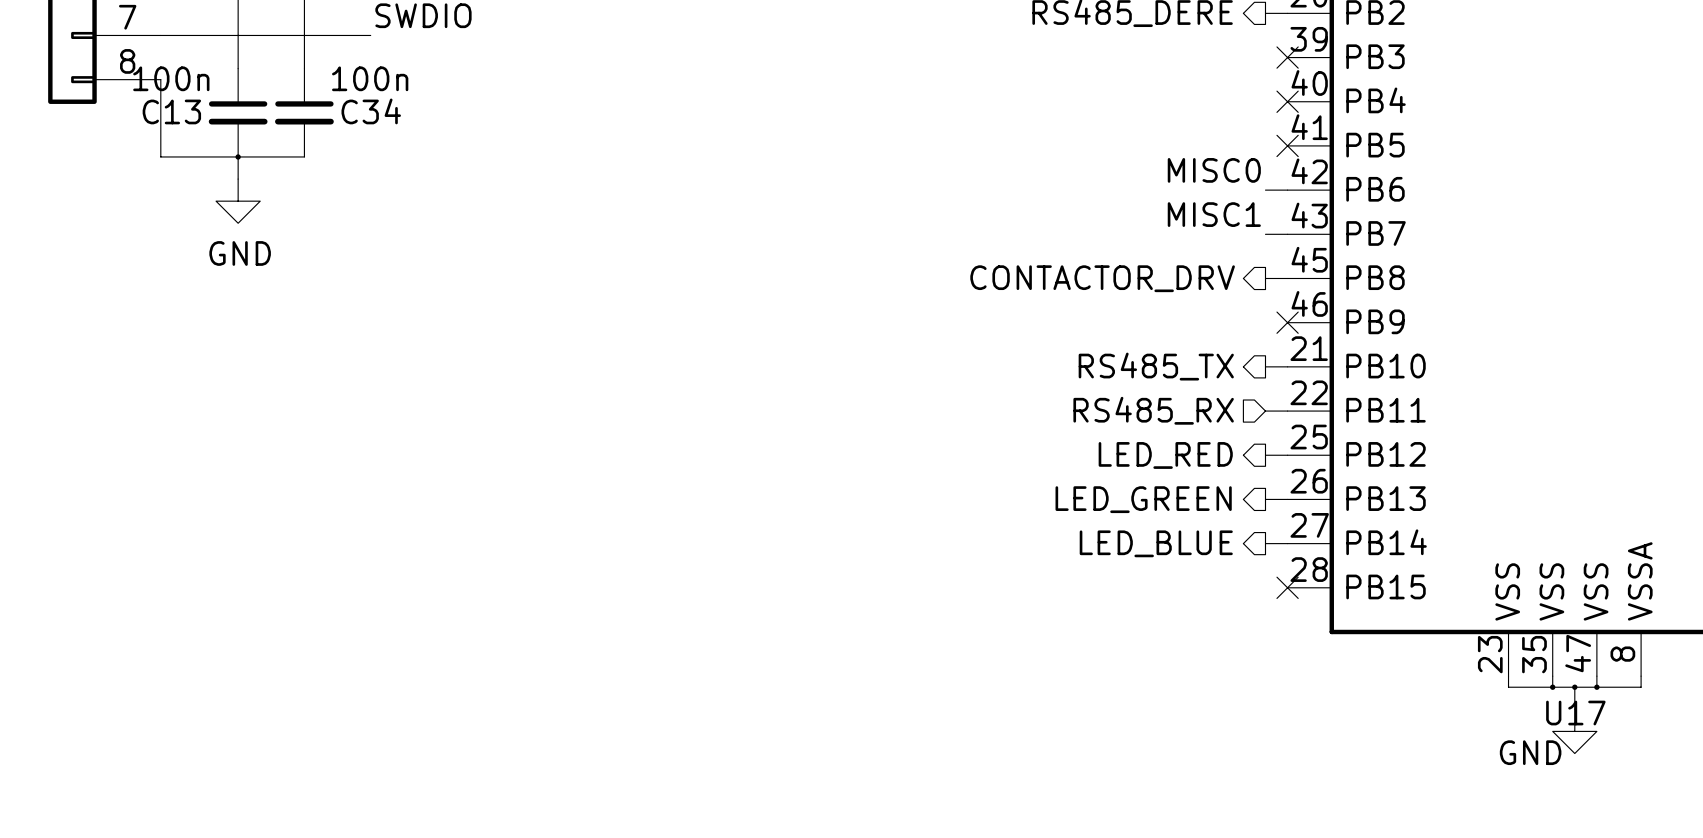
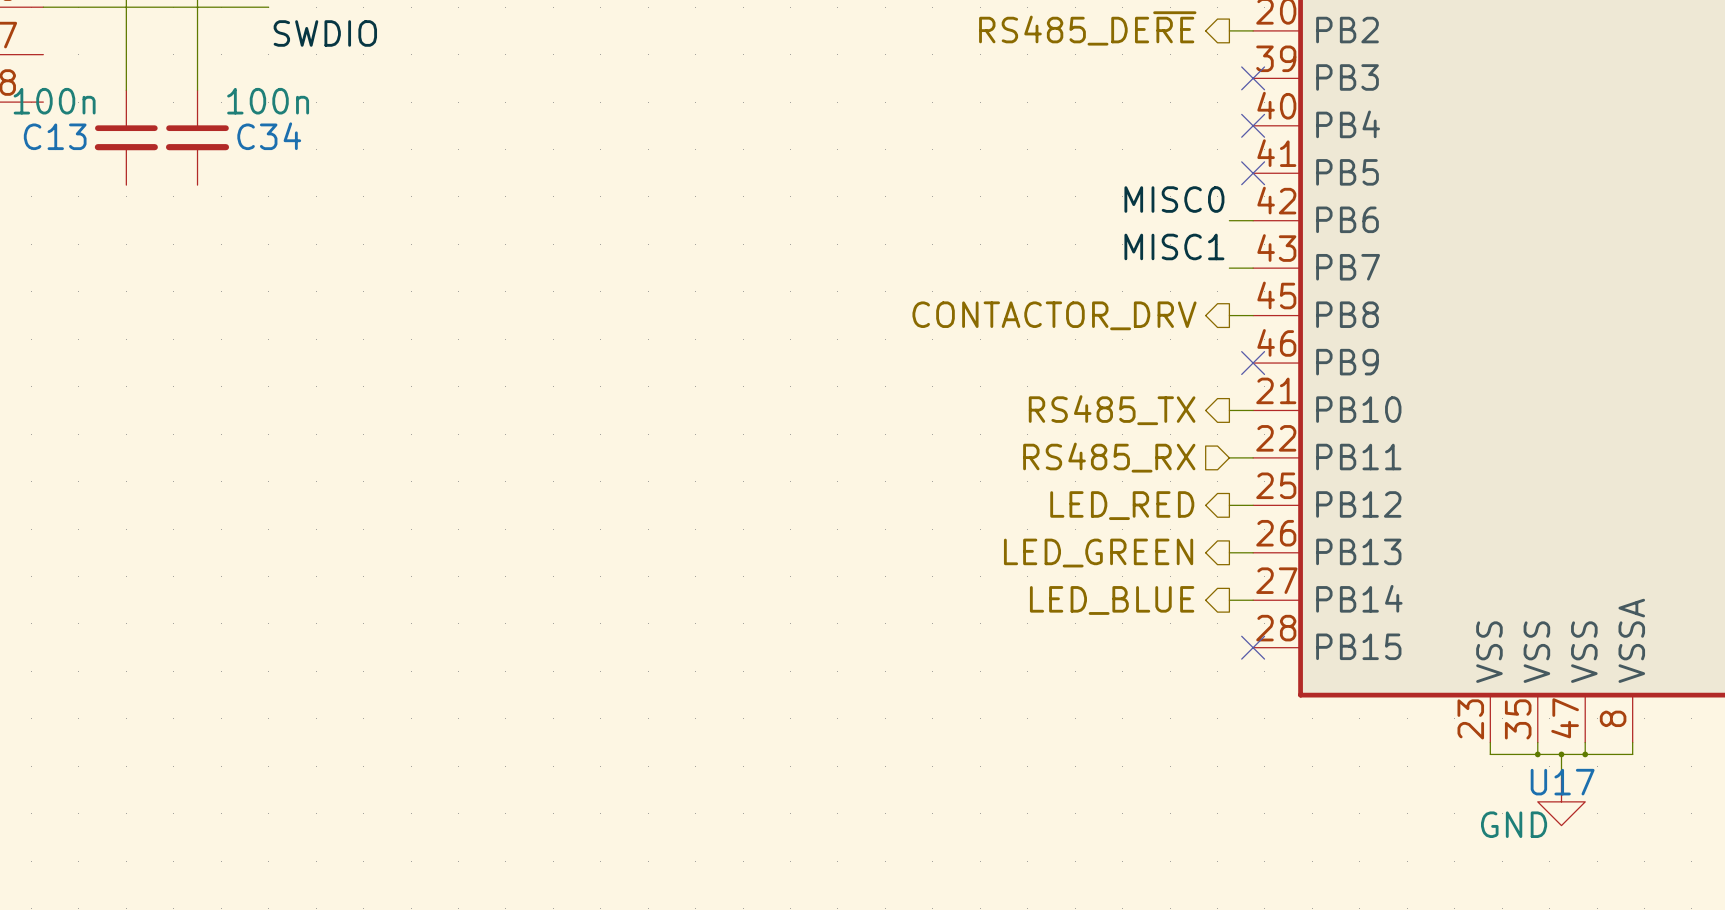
wire: (160, 35) (370, 35) -> none
wire: (160, 79) (160, 156) (304, 156) -> none
wire: (238, 156) (238, 179) -> none
junction: (238, 156) -> none
power symbol: GND (238, 201) -> none

